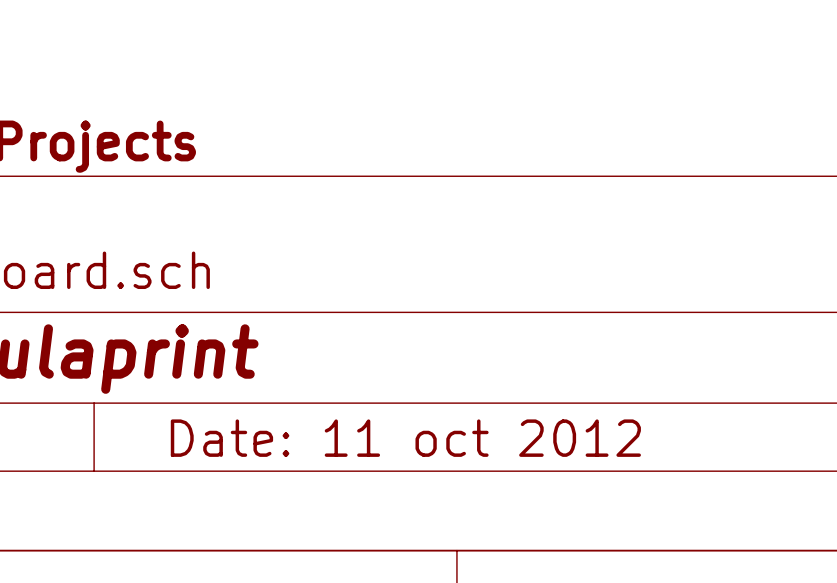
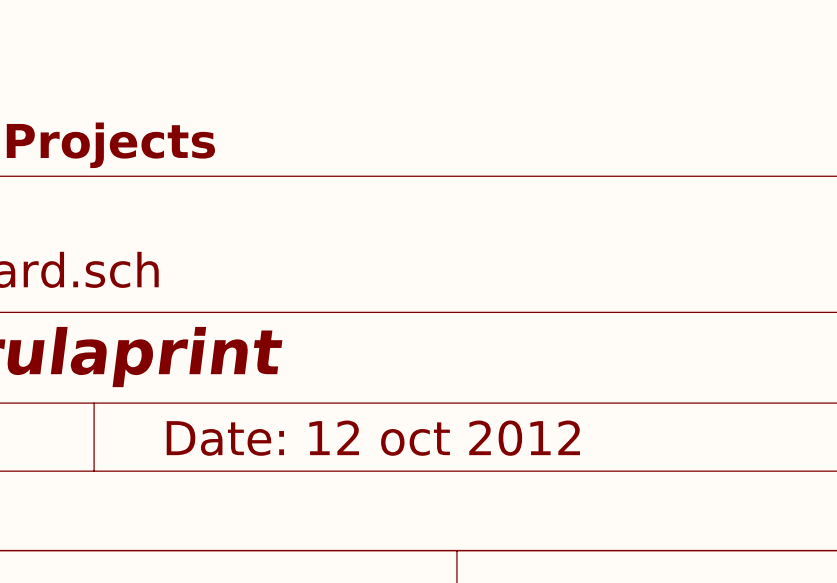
title block: Date: 11 oct 2012 (405, 438) -> Date: 12 oct 2012 (373, 438)

